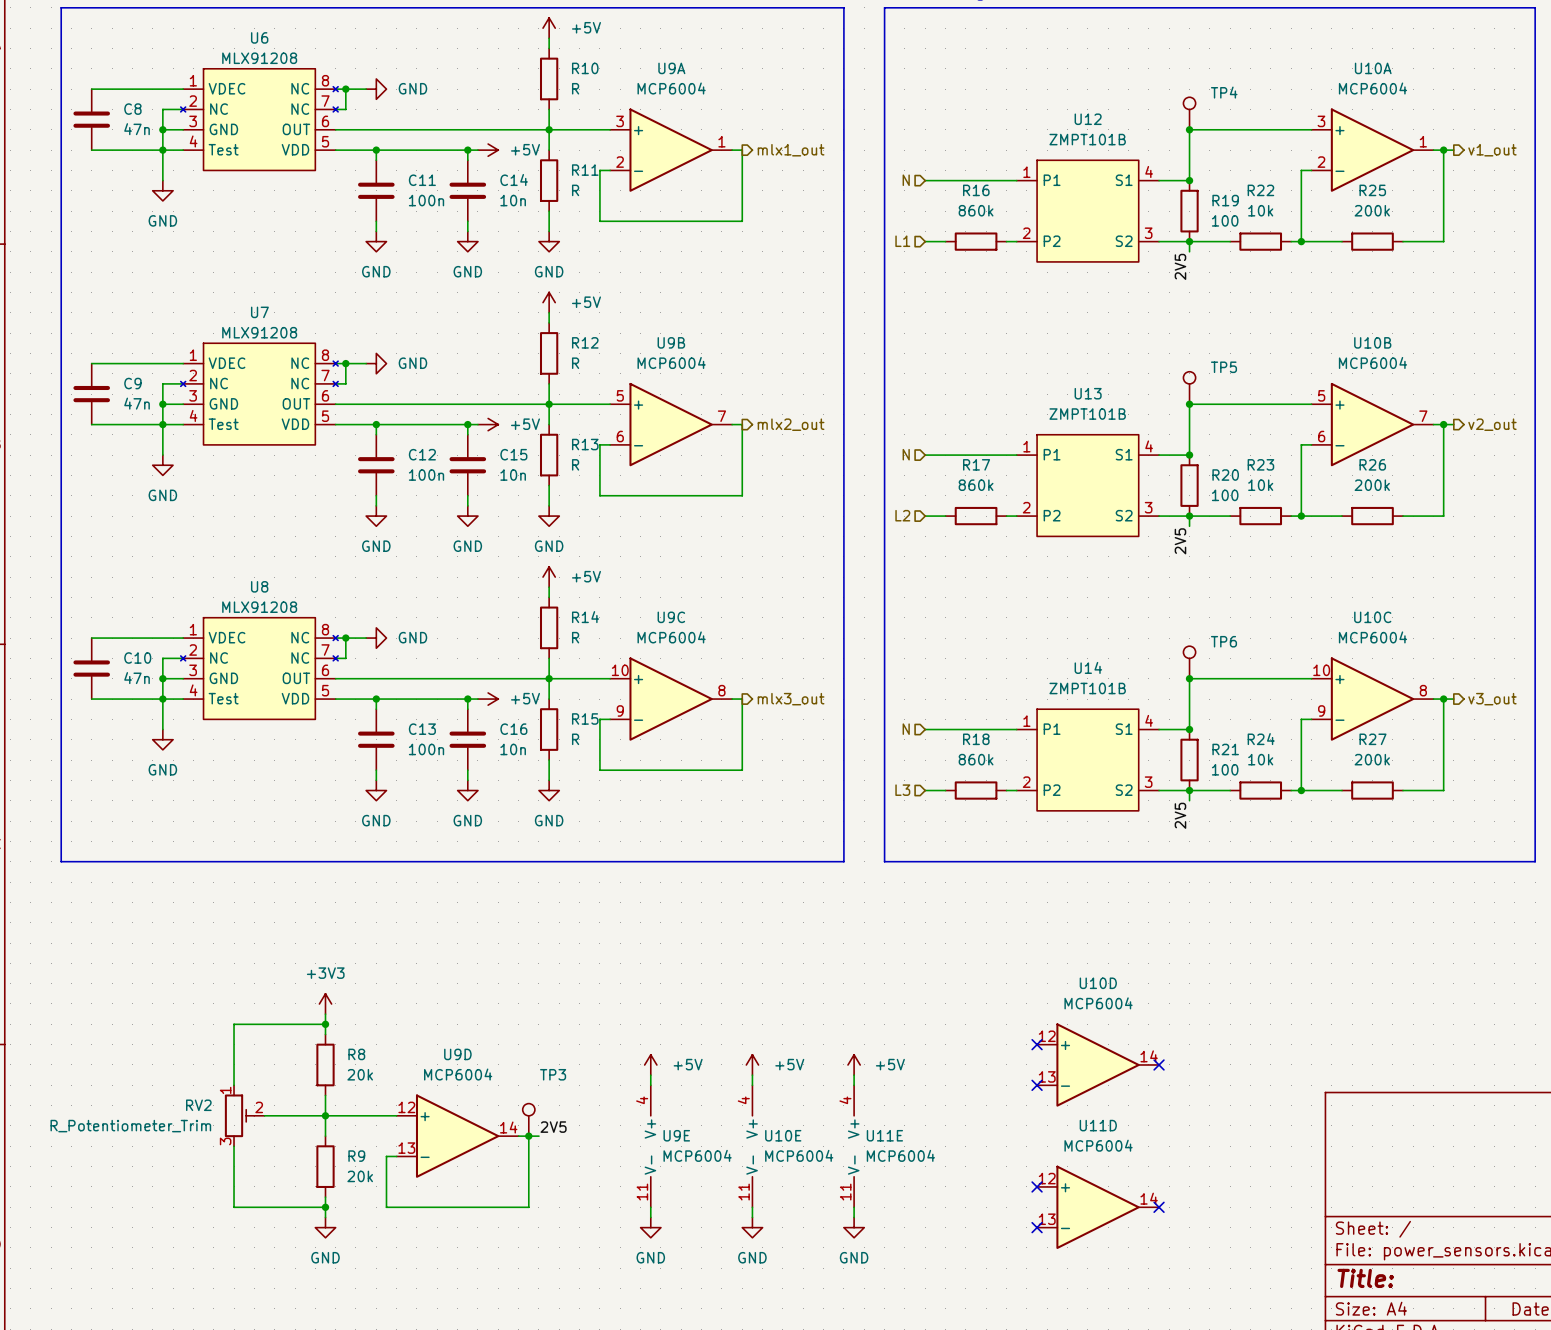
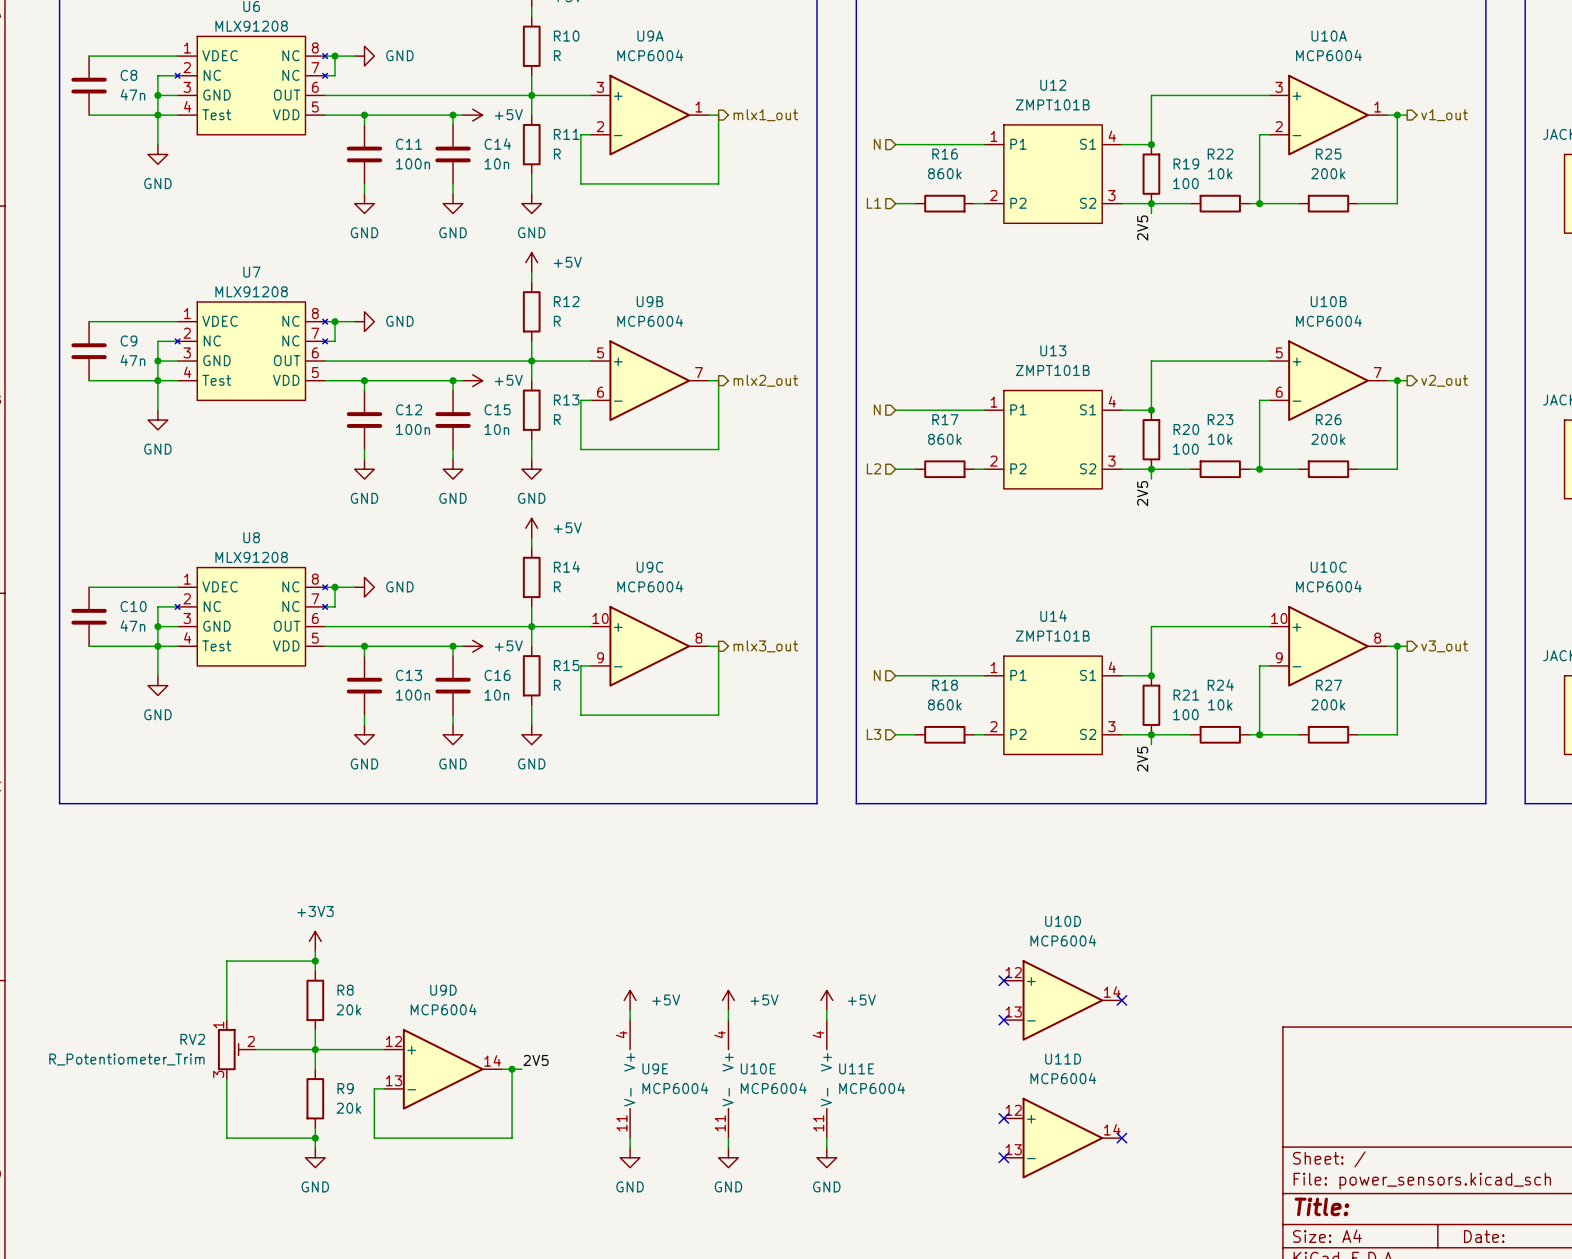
TP4: (1189, 113) -> none
junction: (1189, 129) -> none
TP5: (1189, 387) -> none
junction: (1189, 404) -> none
TP6: (1189, 662) -> none
junction: (1189, 678) -> none
TP3: (528, 1119) -> none

